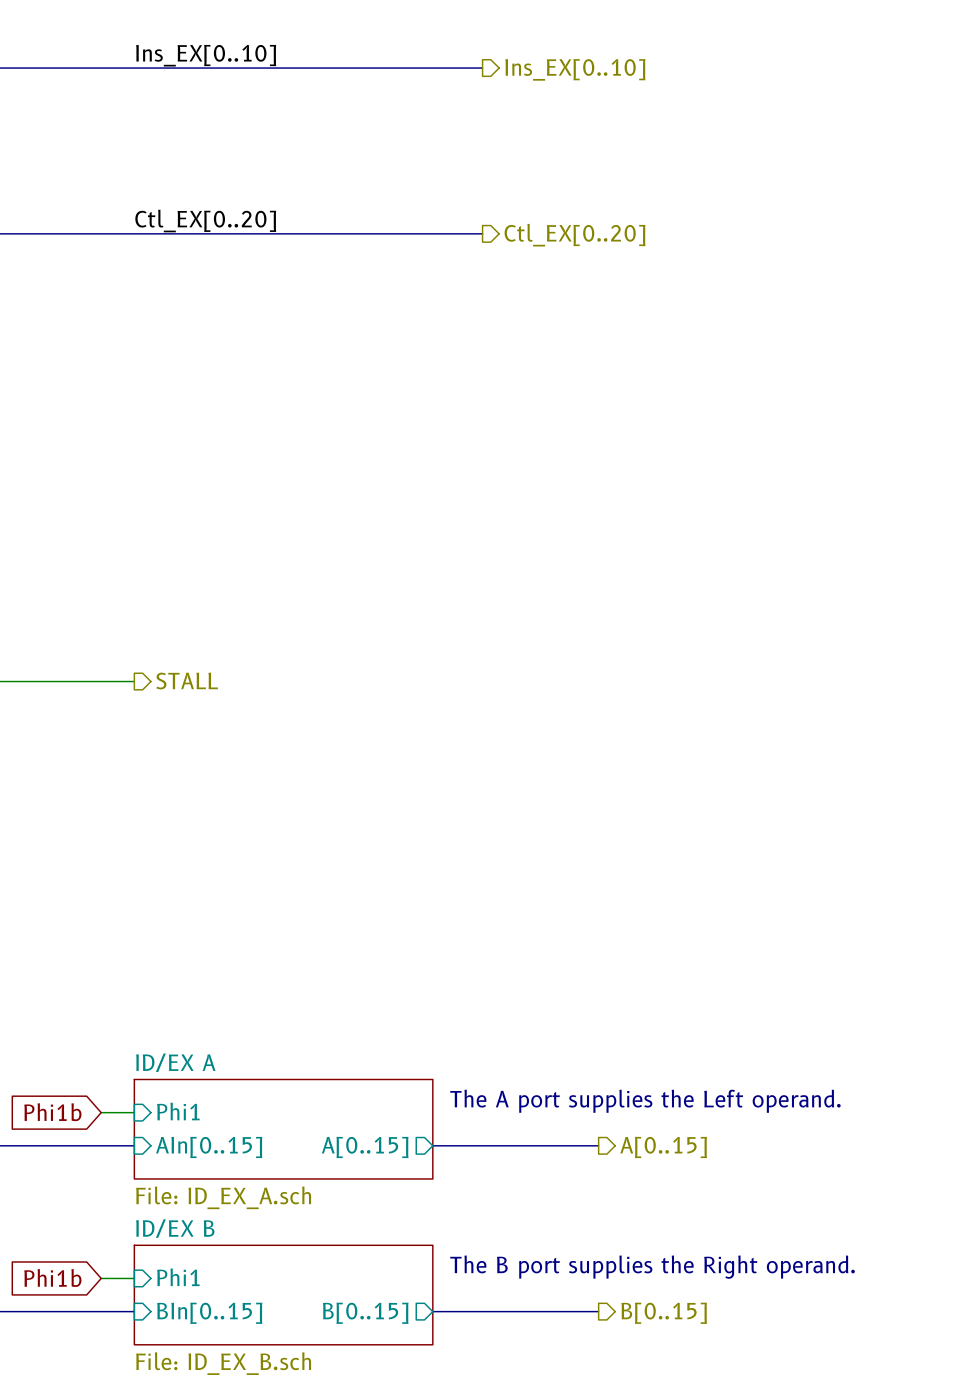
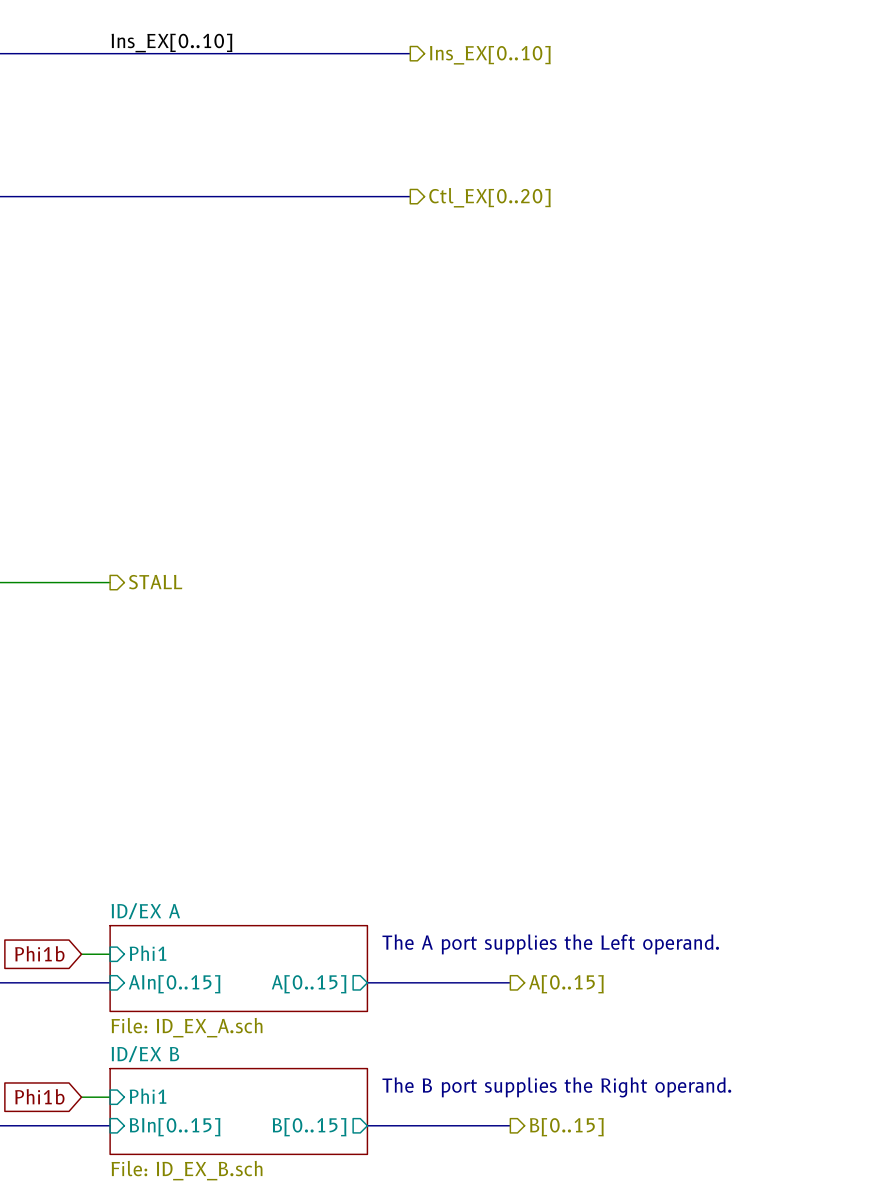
label: Ctl_EX[0..20] (205, 220) -> none

